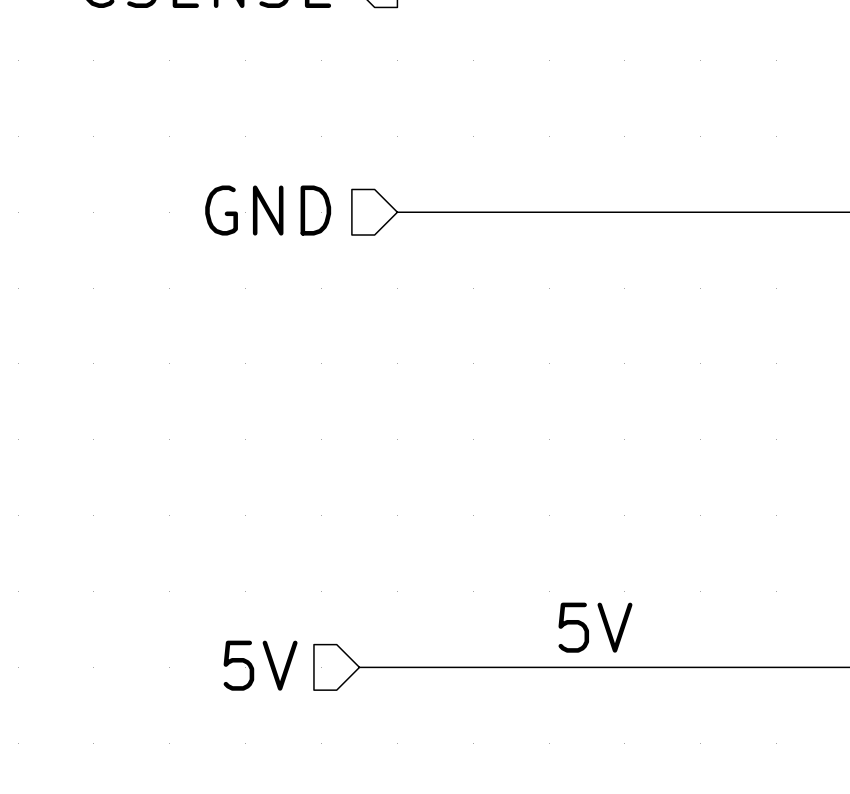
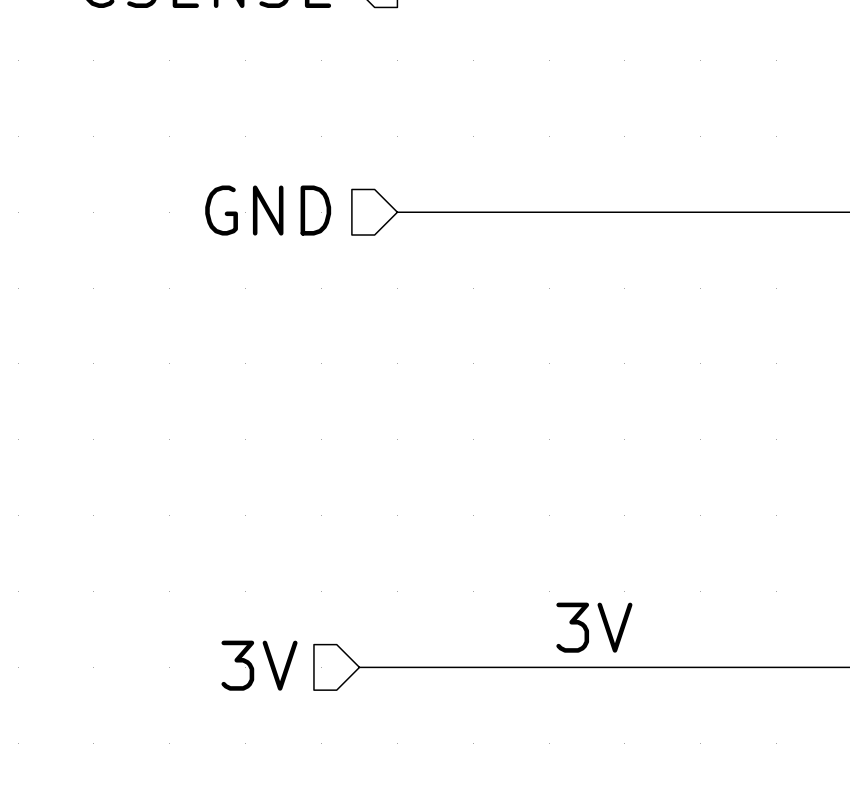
label: 5V (595, 627) -> 3V (594, 627)
hierarchical label: 5V (260, 665) -> 3V (259, 665)

